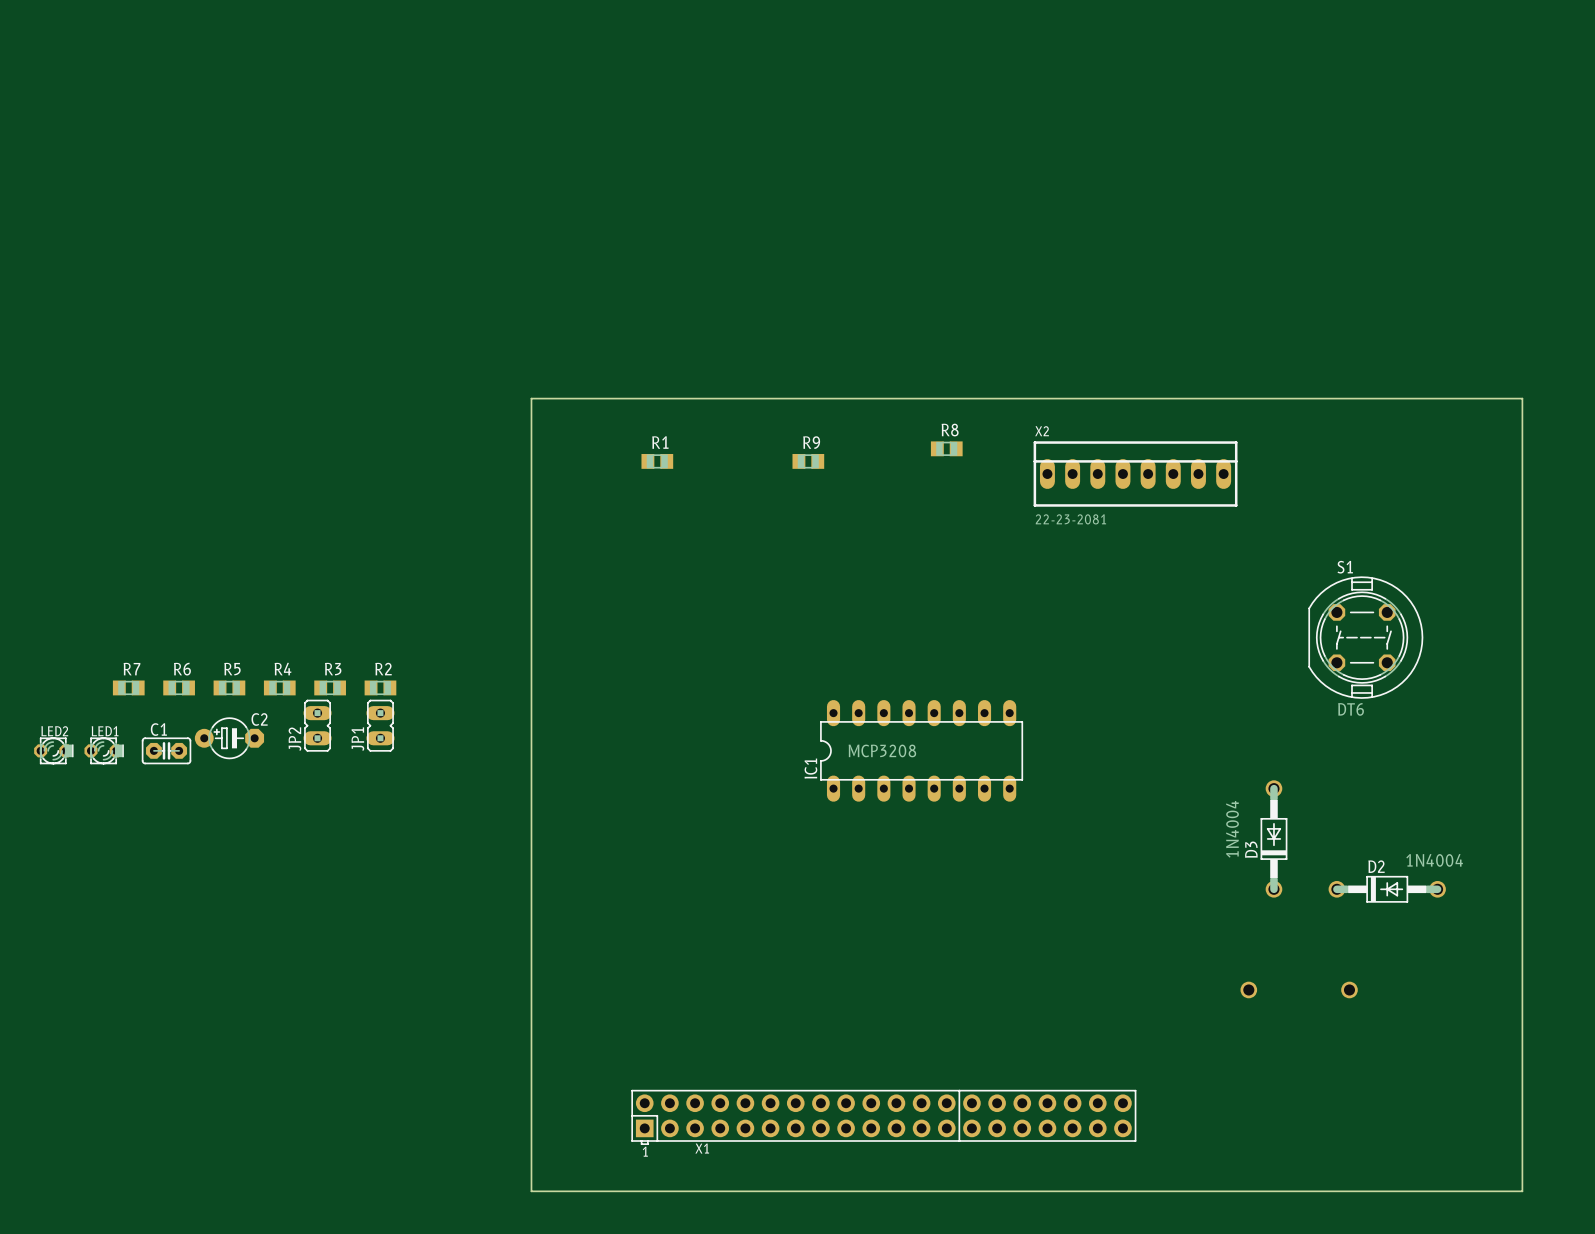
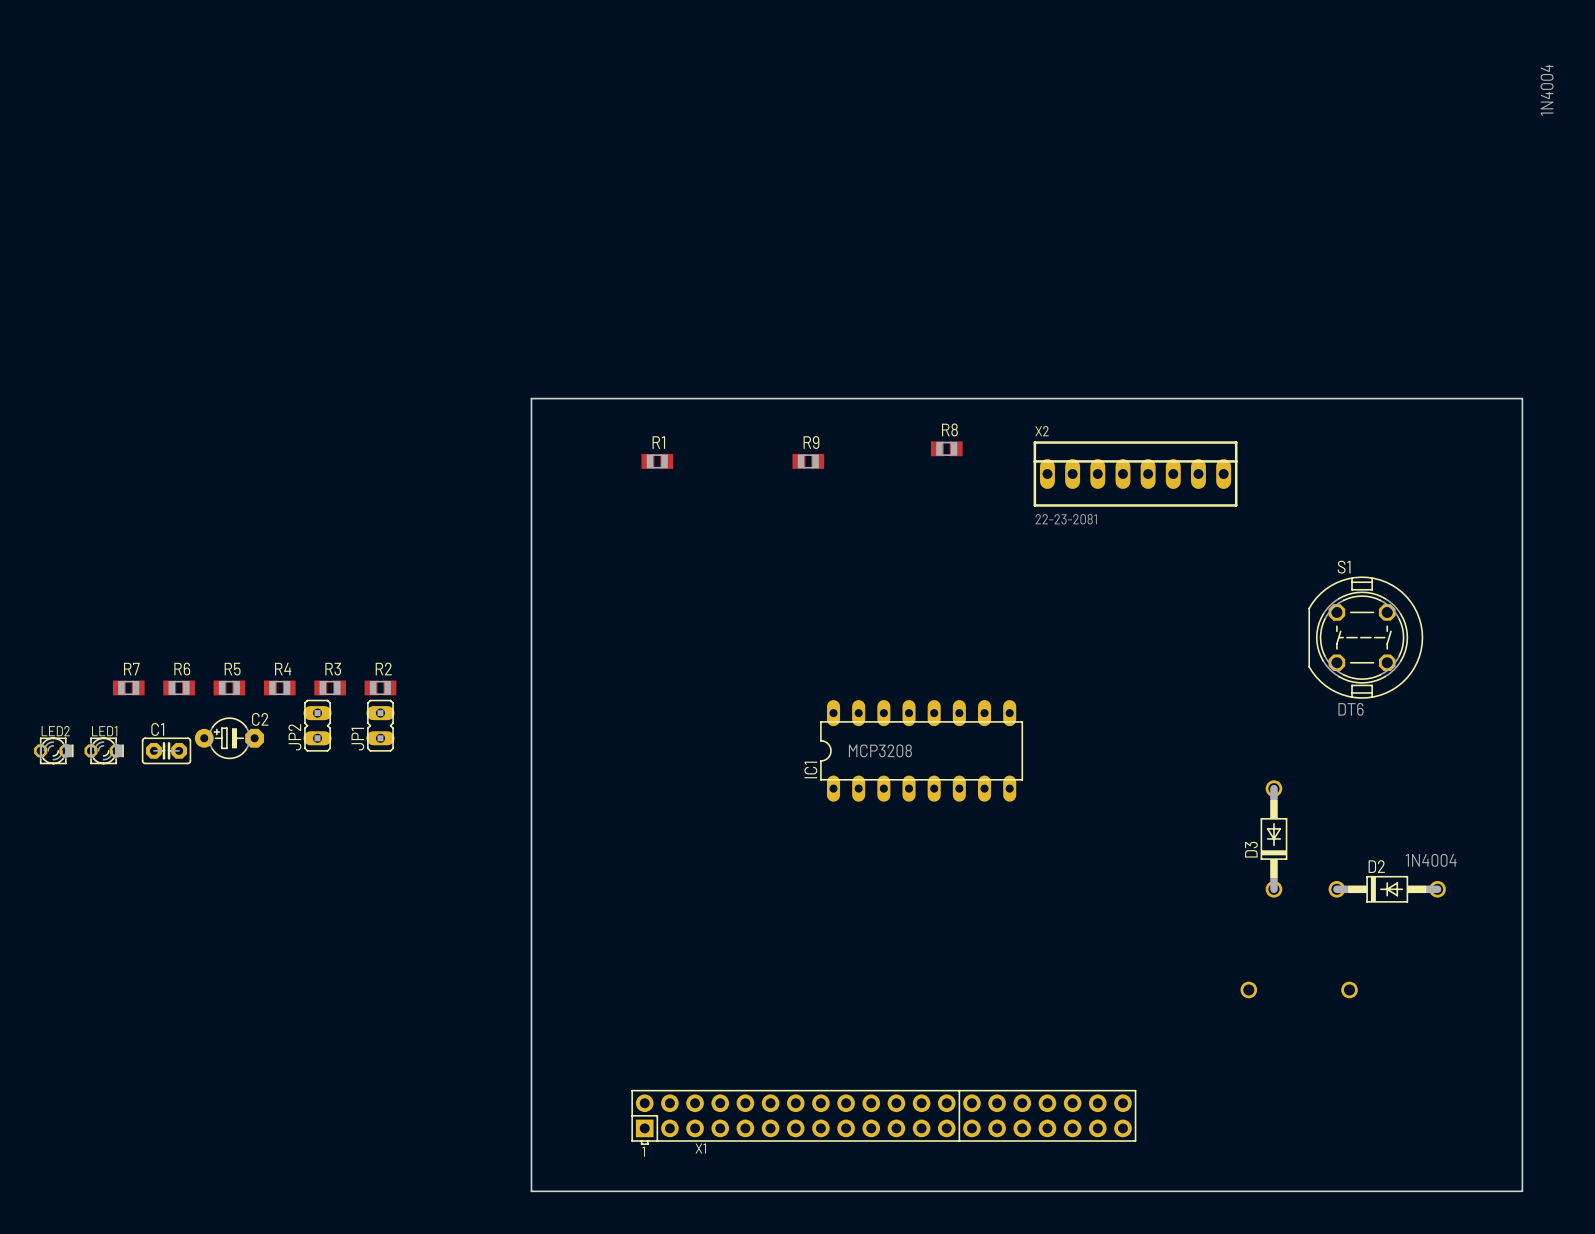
D3 value position: 1N4004 (1232, 829) -> 1N4004 (1547, 90)

